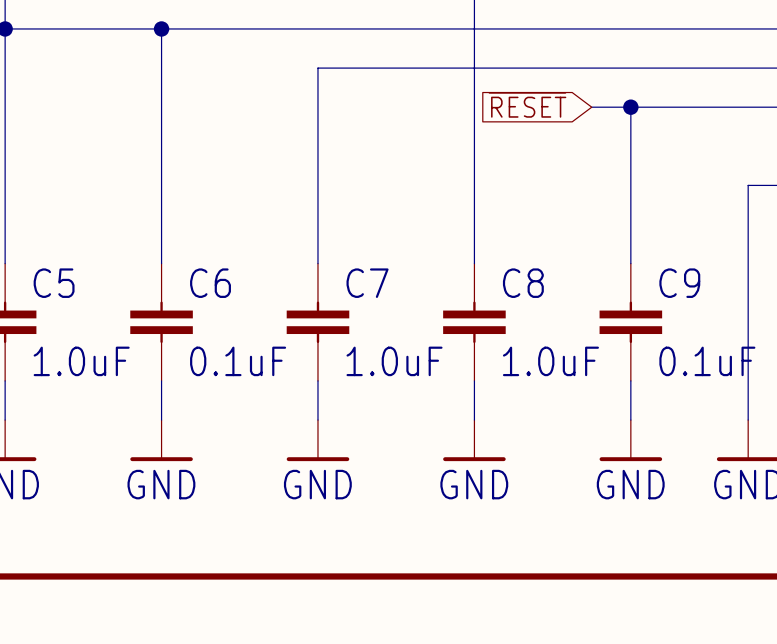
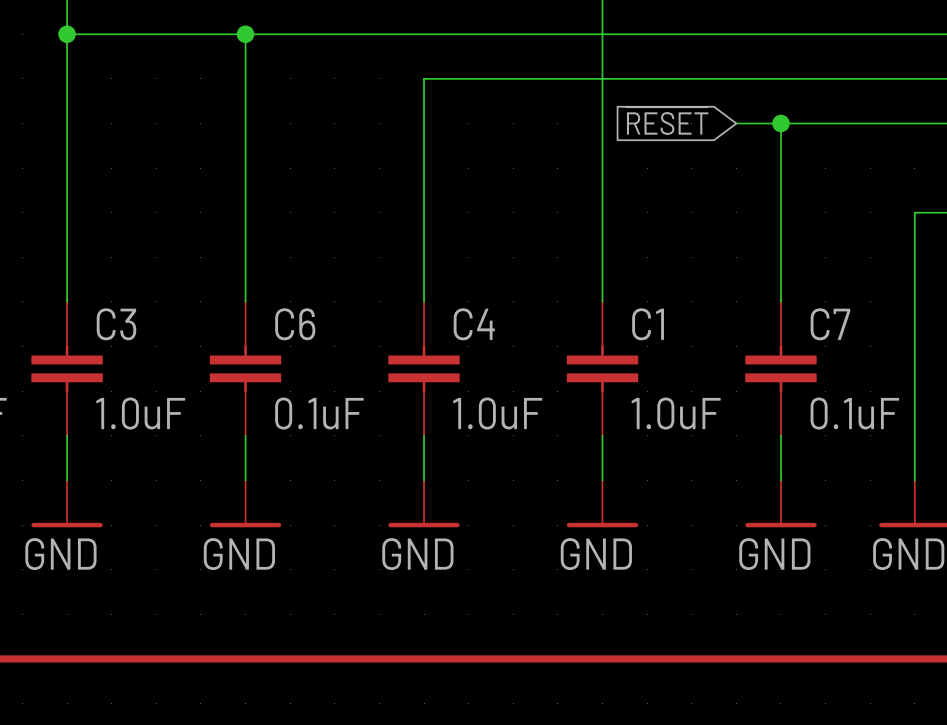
C5 name: C5 (54, 283) -> C3 (116, 324)
C7 name: C7 (367, 283) -> C4 (474, 324)
C8 name: C8 (523, 283) -> C1 (648, 324)
C9 name: C9 (679, 283) -> C7 (830, 324)

